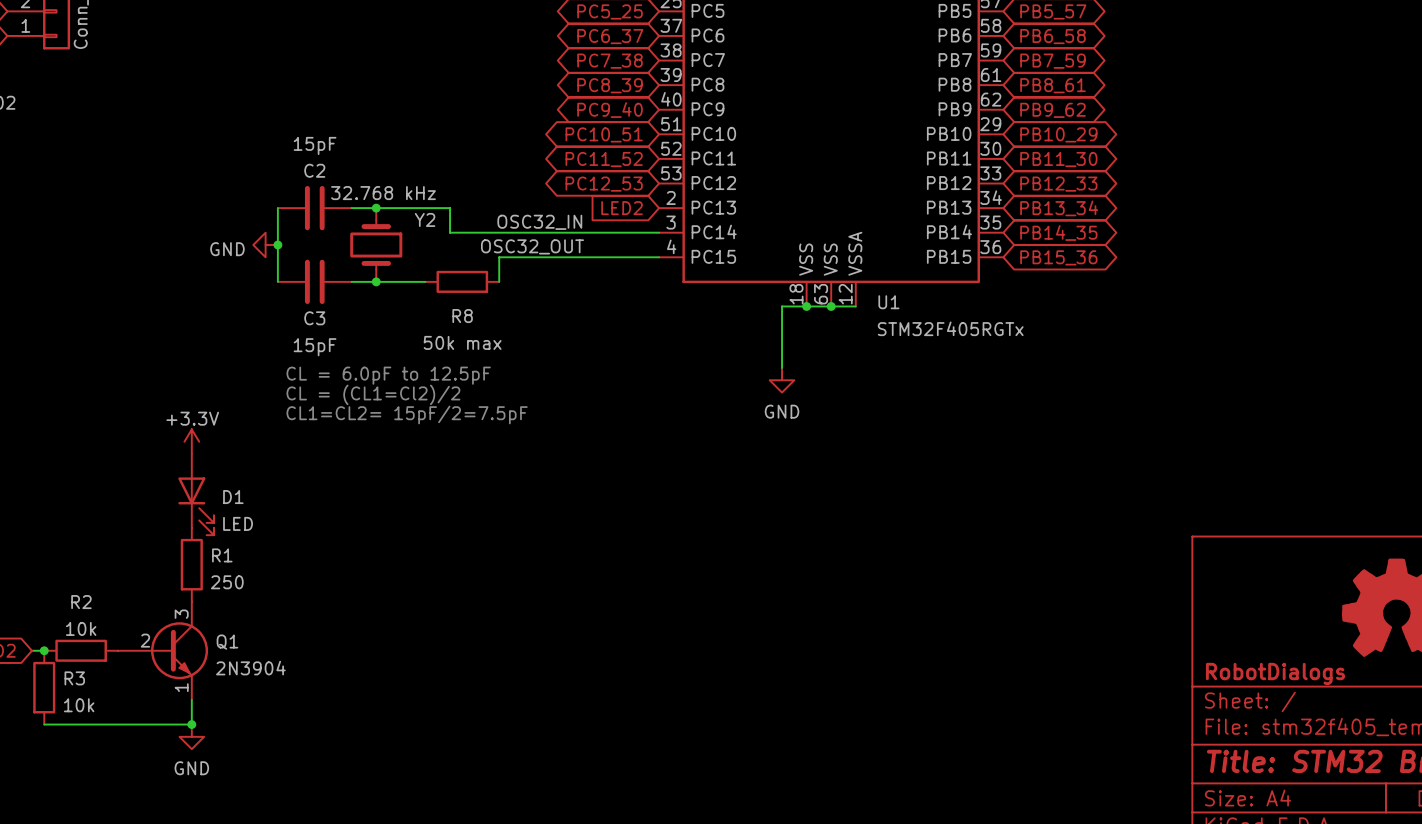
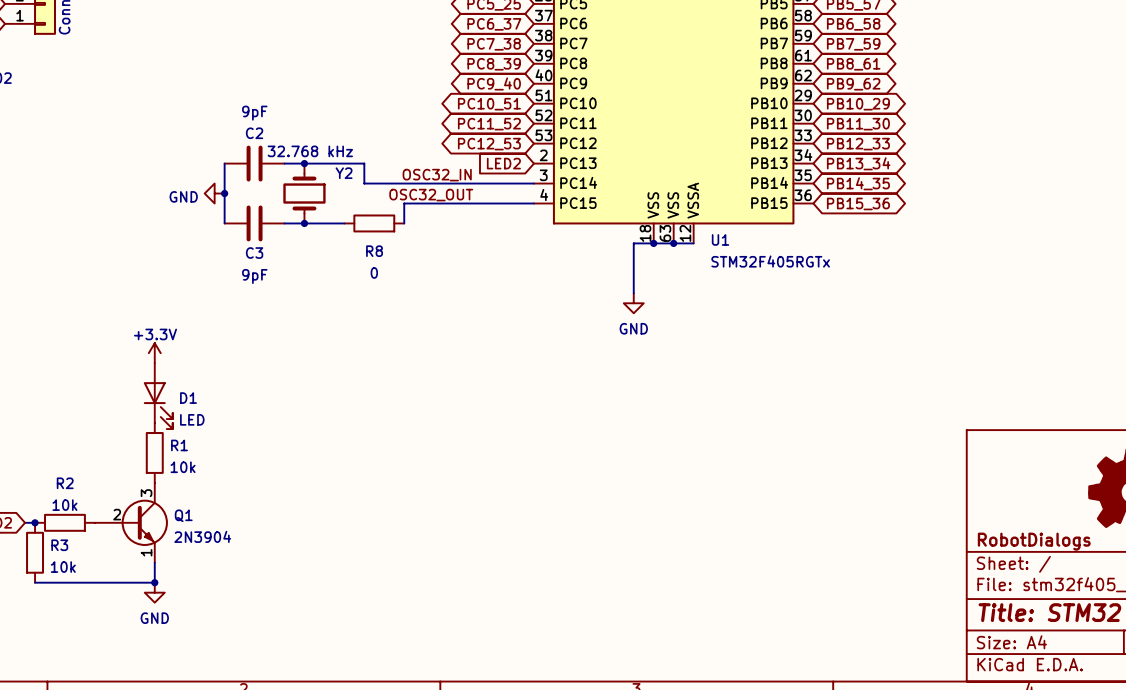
C2 value: 15pF (315, 145) -> 9pF (254, 113)
R8 value: 50k max (462, 342) -> 0 (374, 272)
C3 value: 15pF (315, 347) -> 9pF (254, 276)
text: CL = 6.0pF to 12.5pF (388, 375) -> none
text: CL = (CL1=Cl2)/2 (373, 394) -> none
text: CL1=CL2= 15pF/2=7.5pF (407, 414) -> none
R1 value: 250 (227, 582) -> 10k (183, 467)

